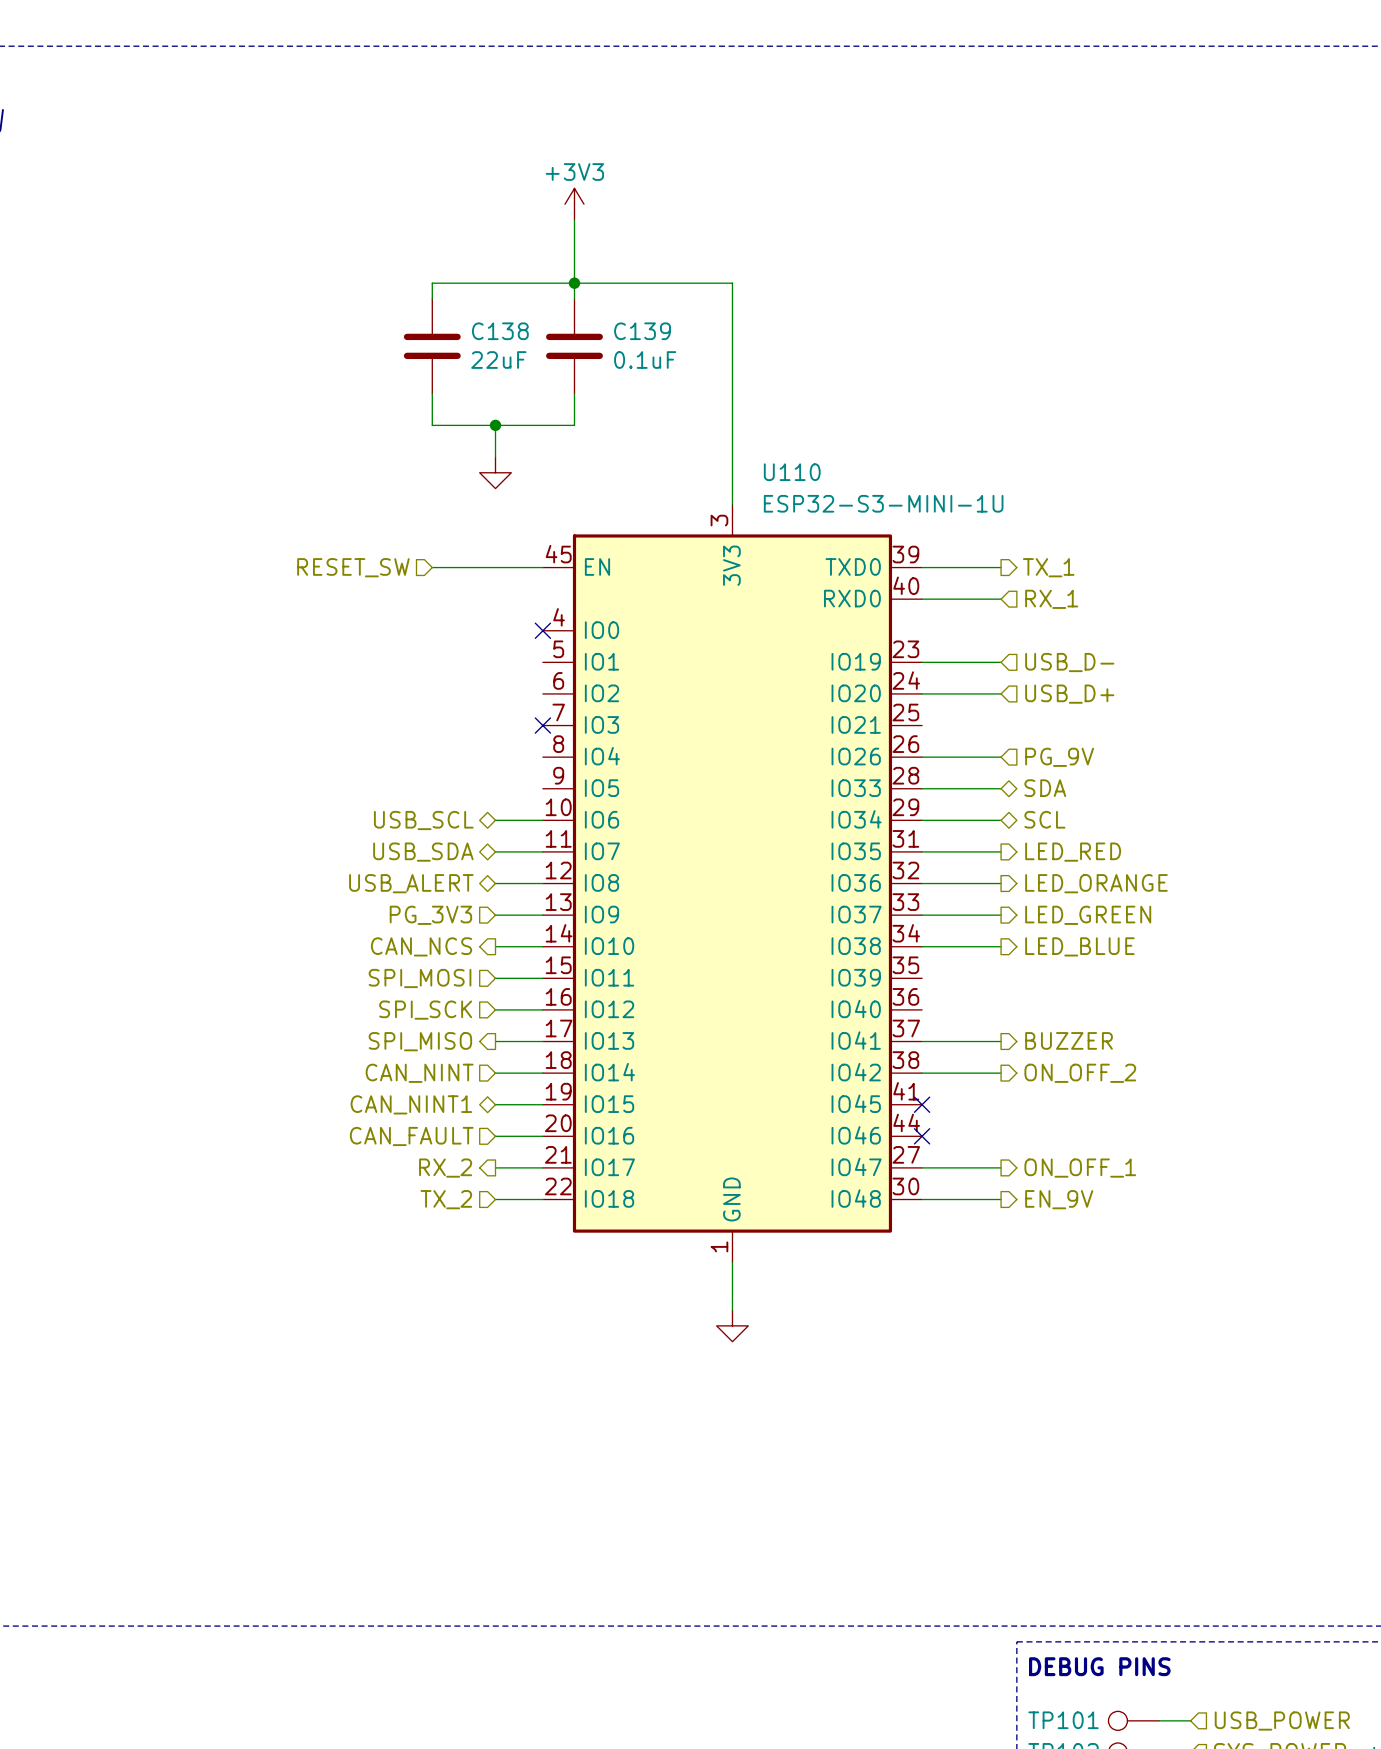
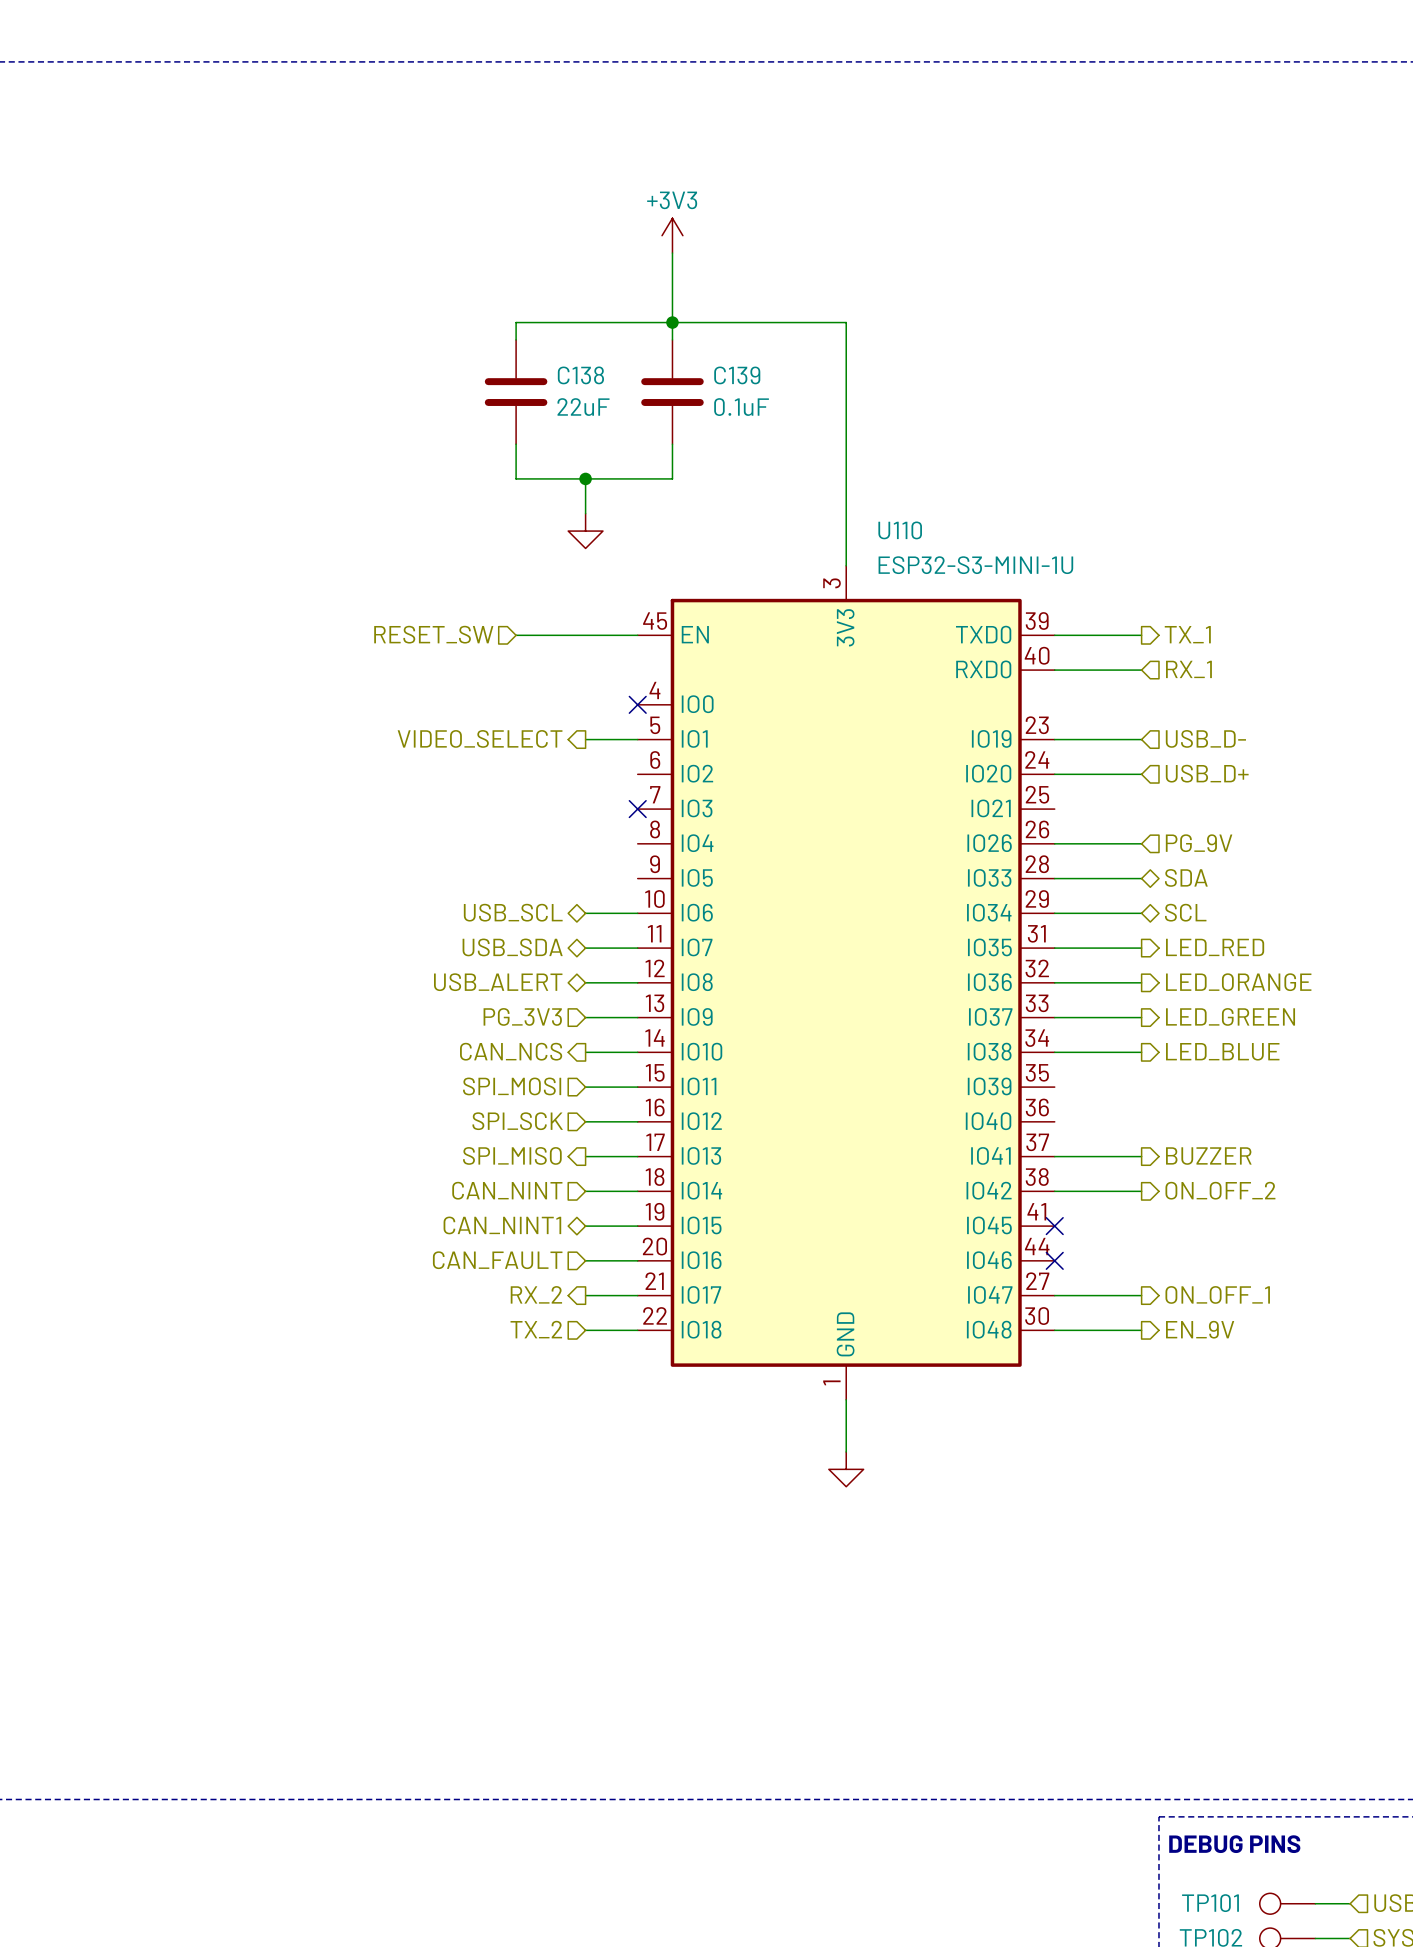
hierarchical label: none -> VIDEO_SELECT (480, 738)
wire: none -> (585, 739) (637, 739)

